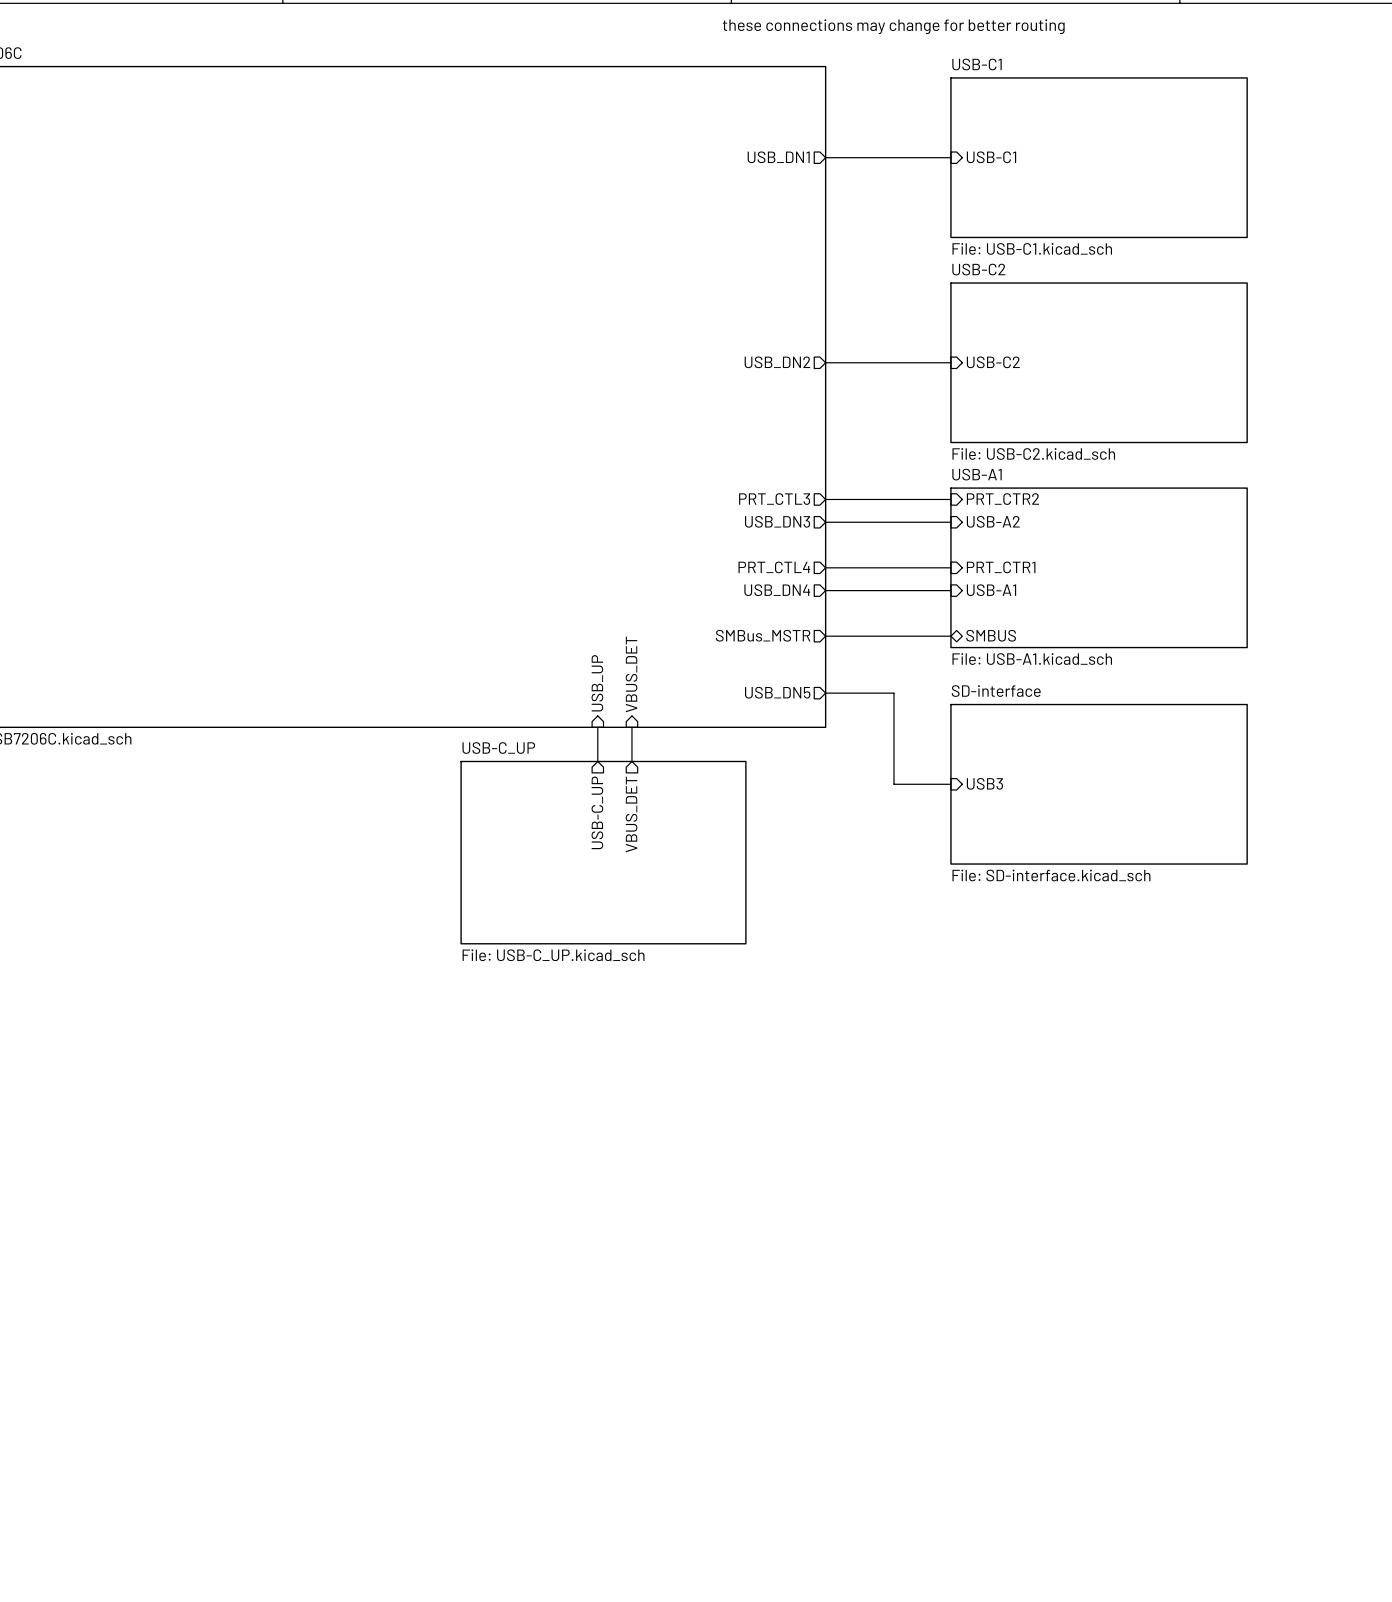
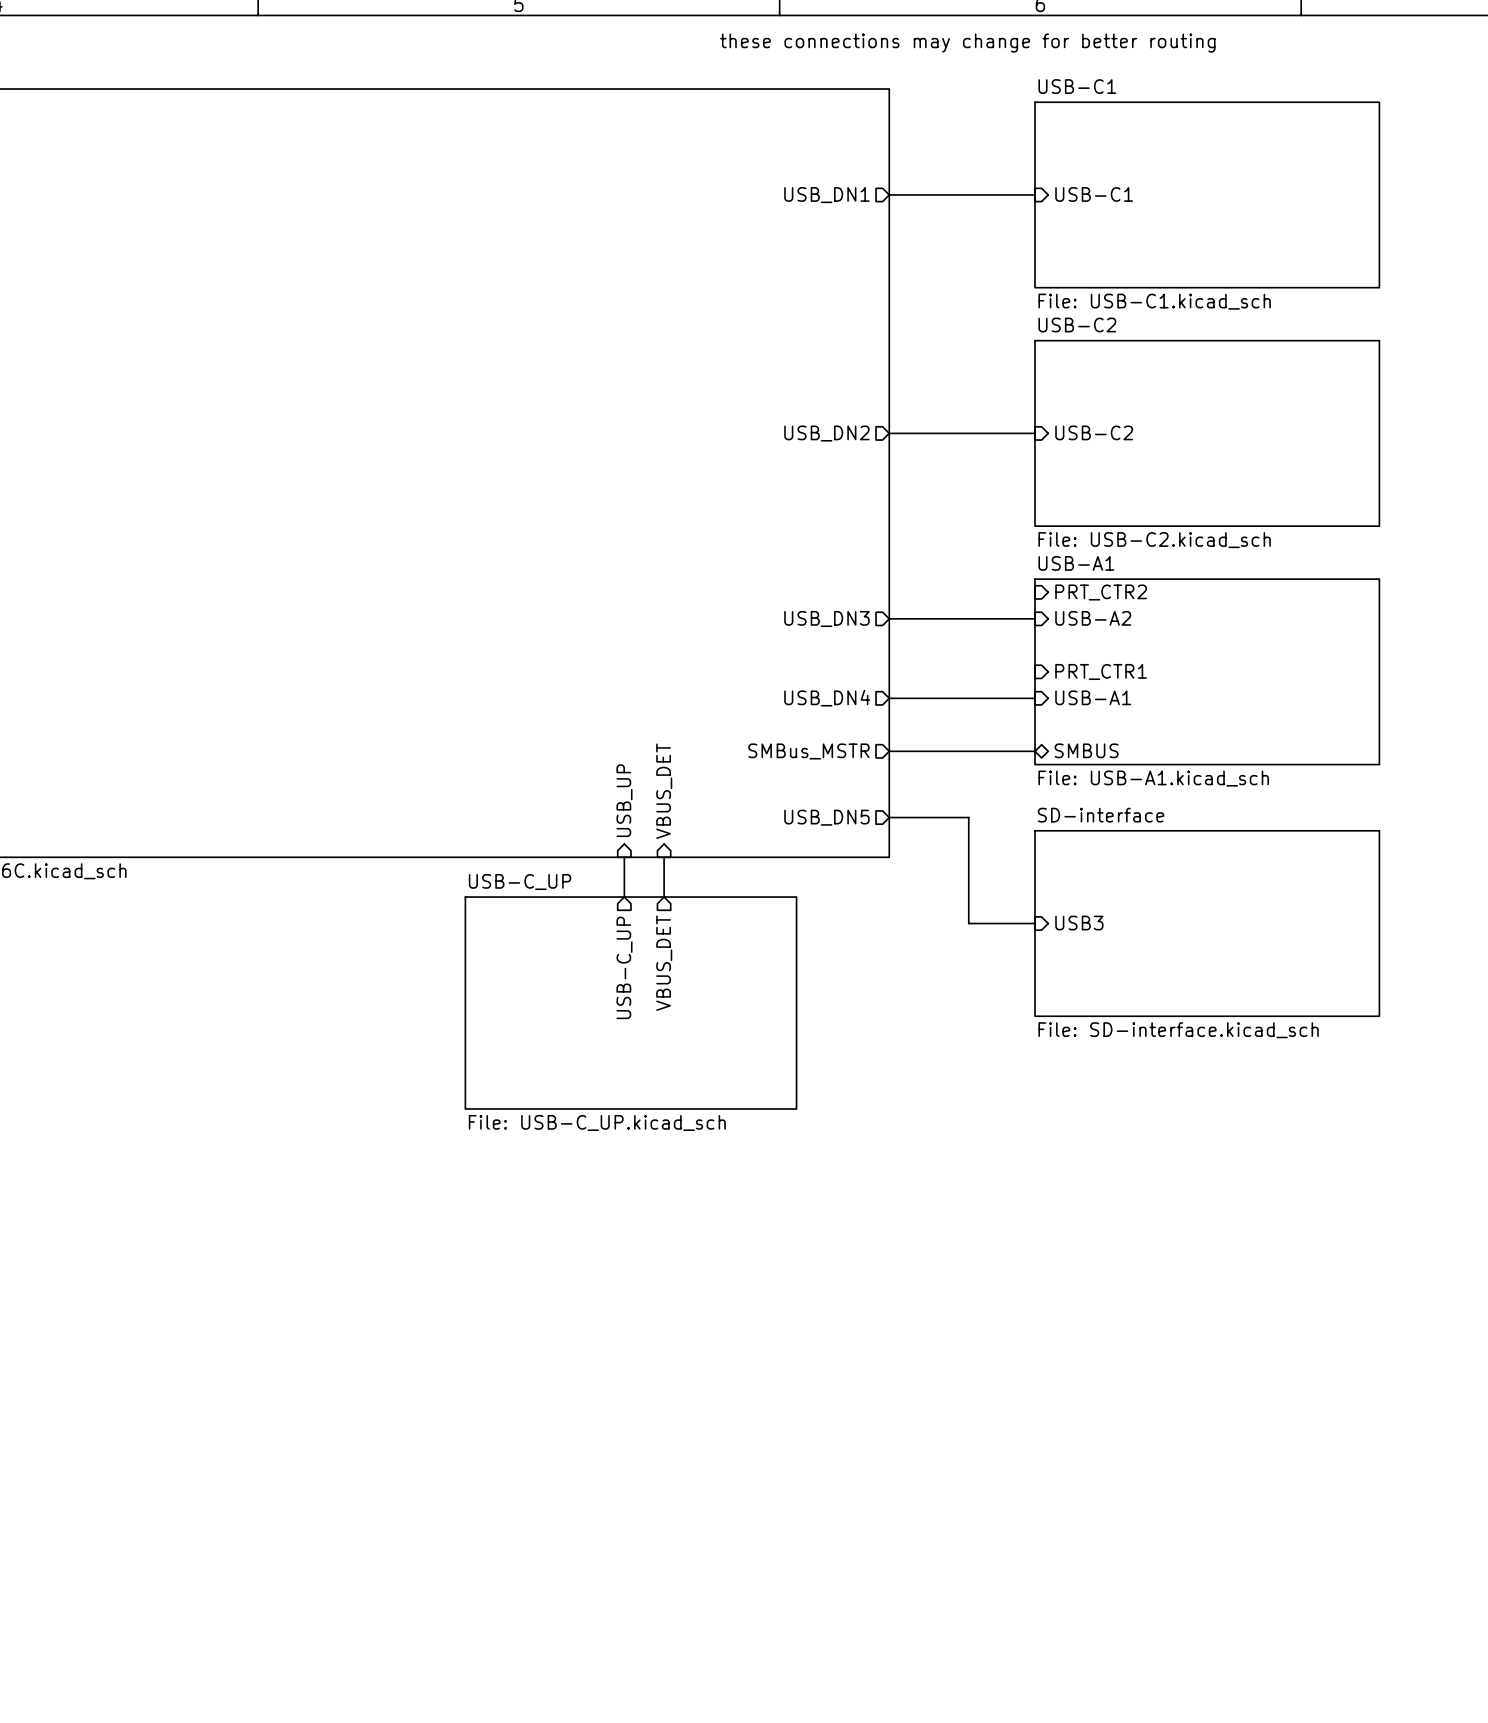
sheet pin: PRT_CTL3 (774, 499) -> none
wire: (825, 499) (950, 499) -> none
sheet pin: PRT_CTL4 (774, 567) -> none
wire: (825, 567) (950, 567) -> none

